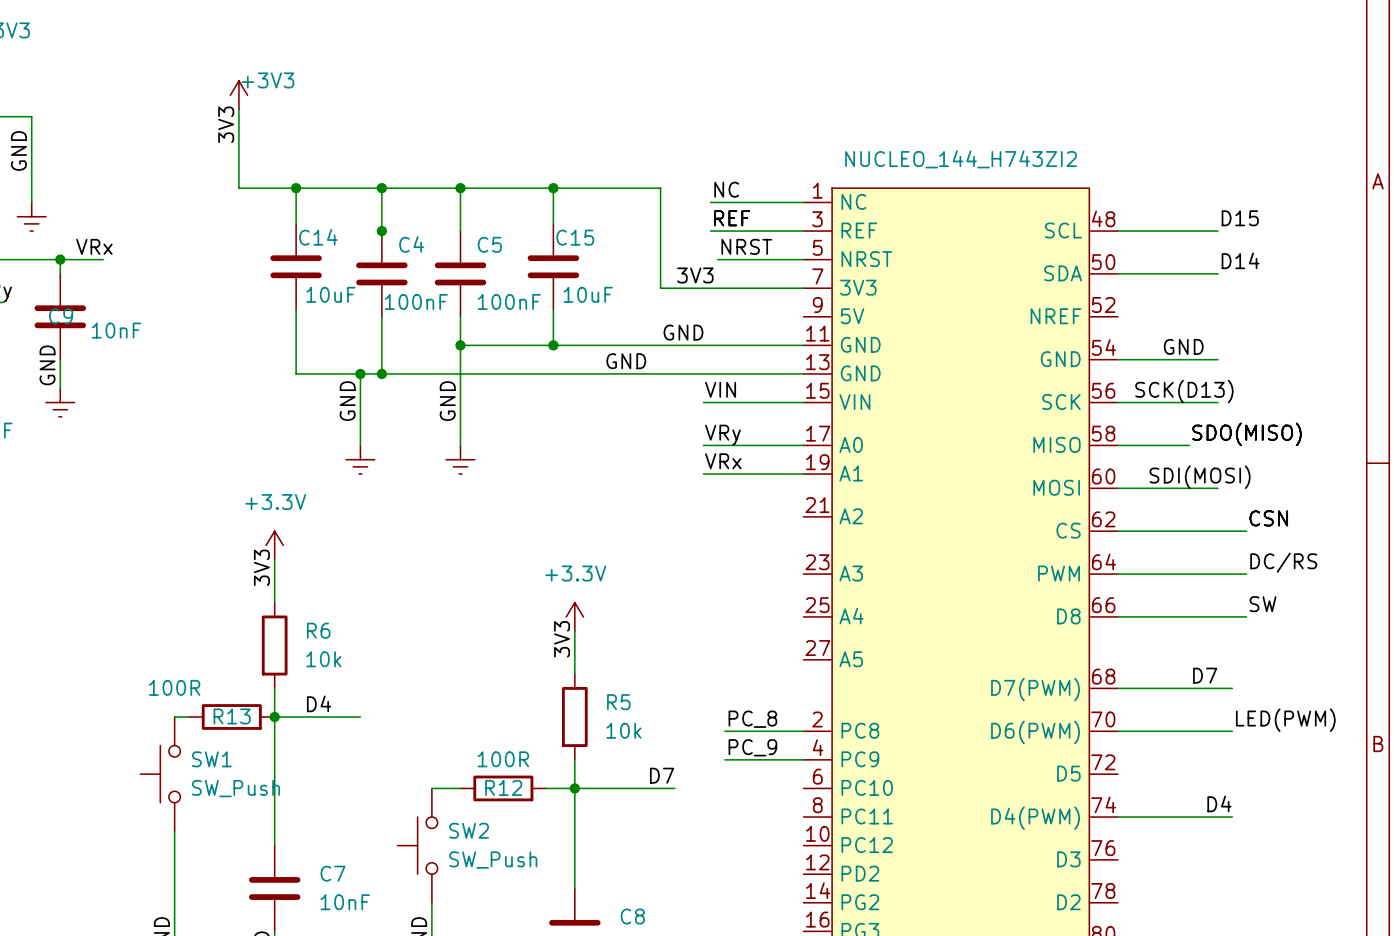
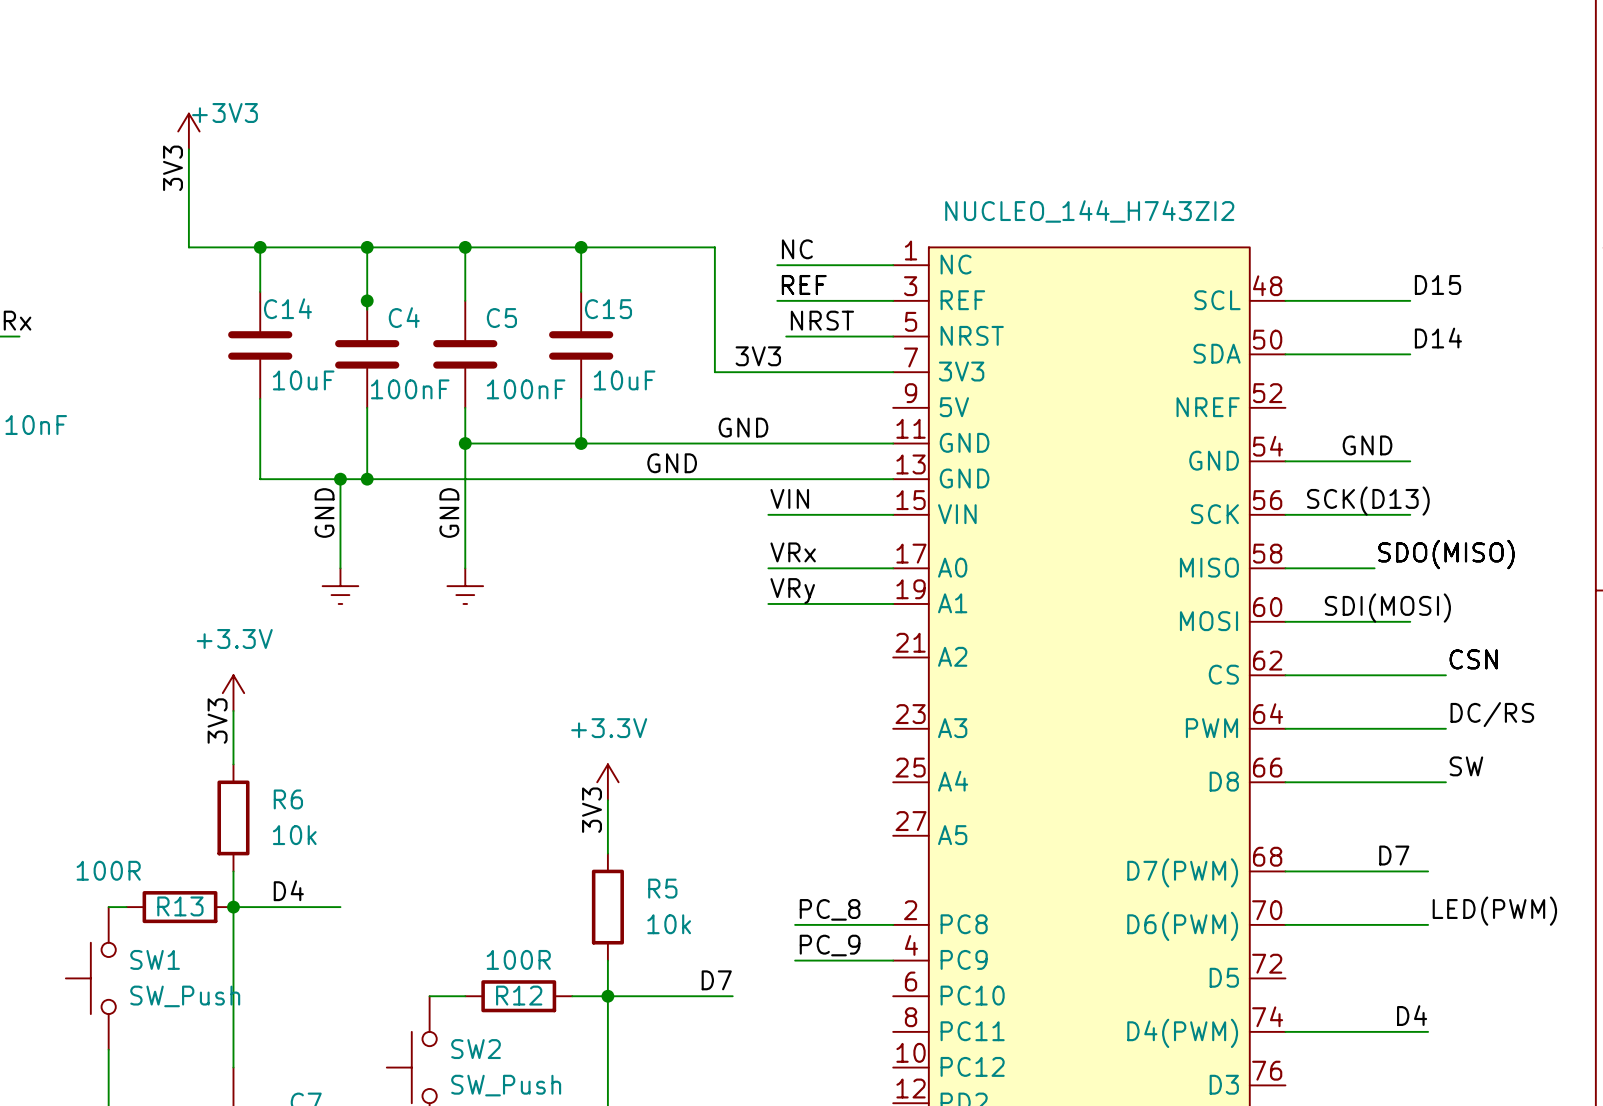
label: VRy (722, 435) -> VRx (793, 552)
label: VRx (723, 461) -> VRy (792, 591)

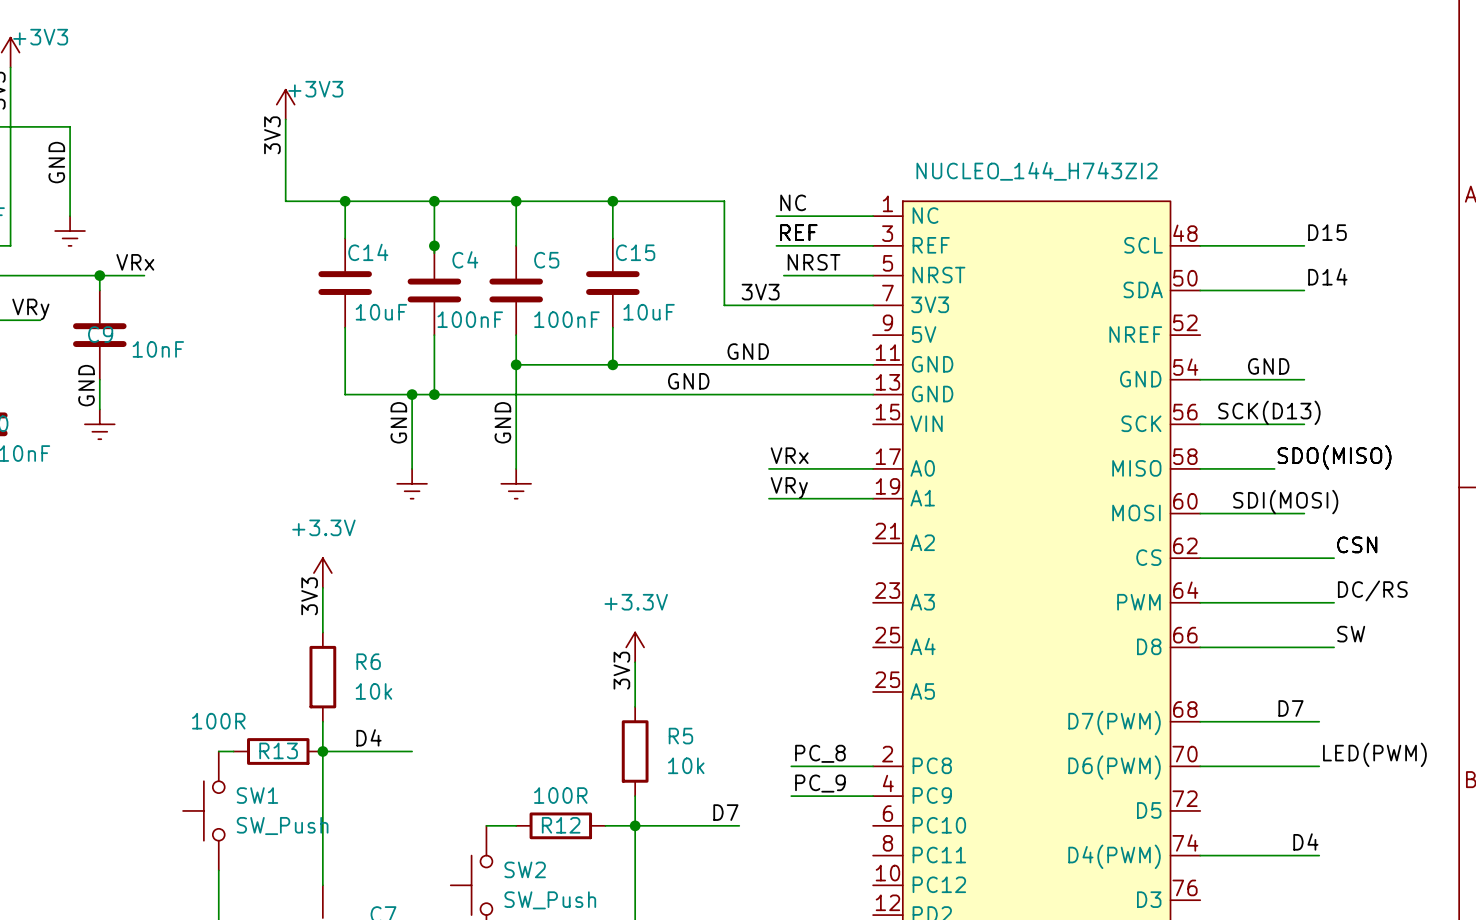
label: VIN (789, 498) -> none
wire: (768, 514) (893, 514) -> none
NUCLEO_144_H743ZI2 pin number: 27 (911, 821) -> 25 (887, 679)

